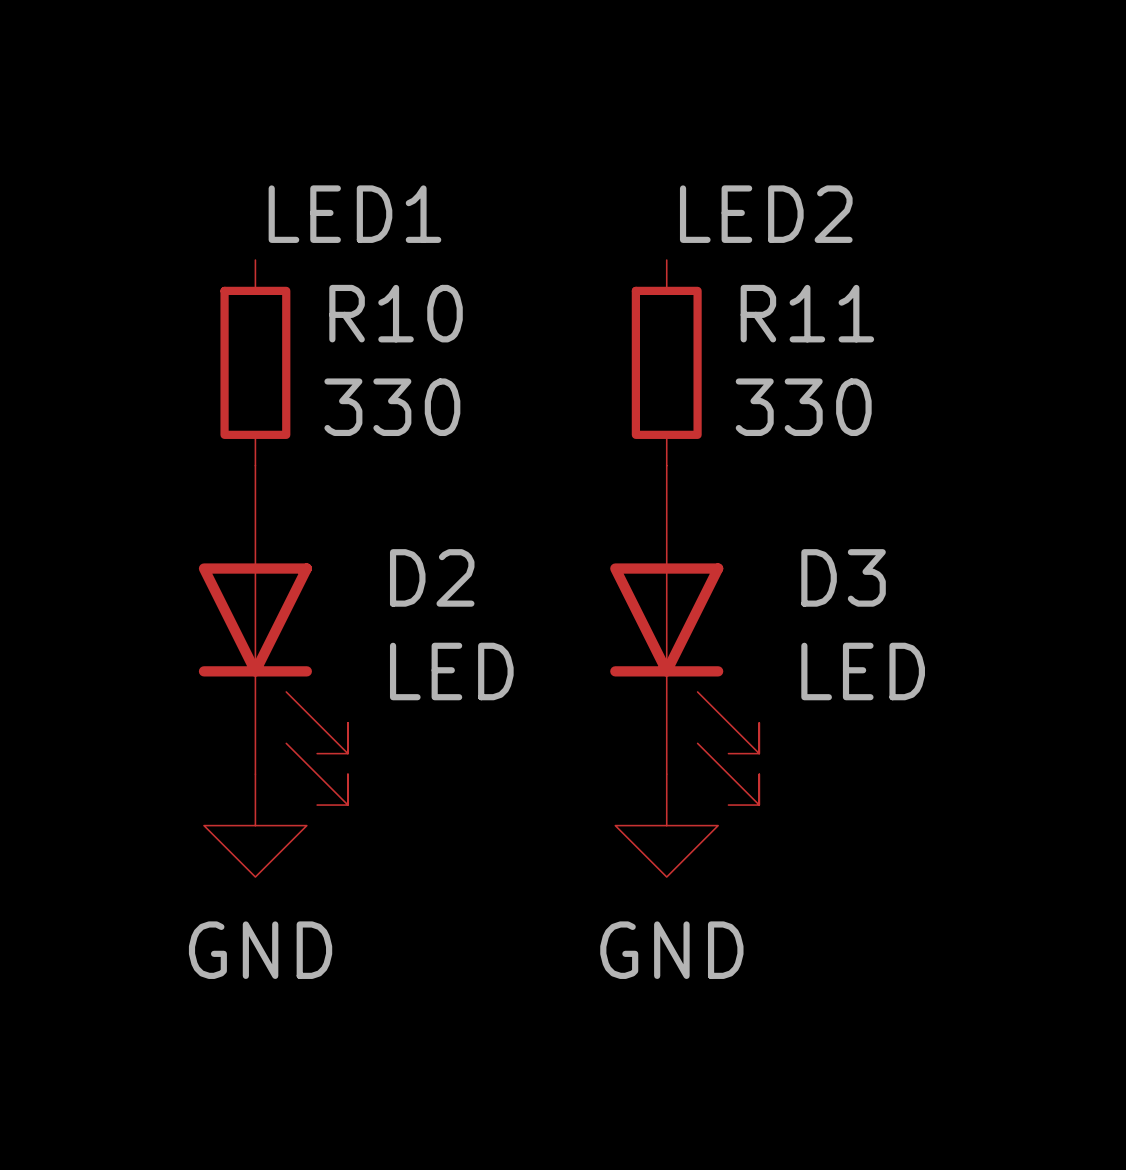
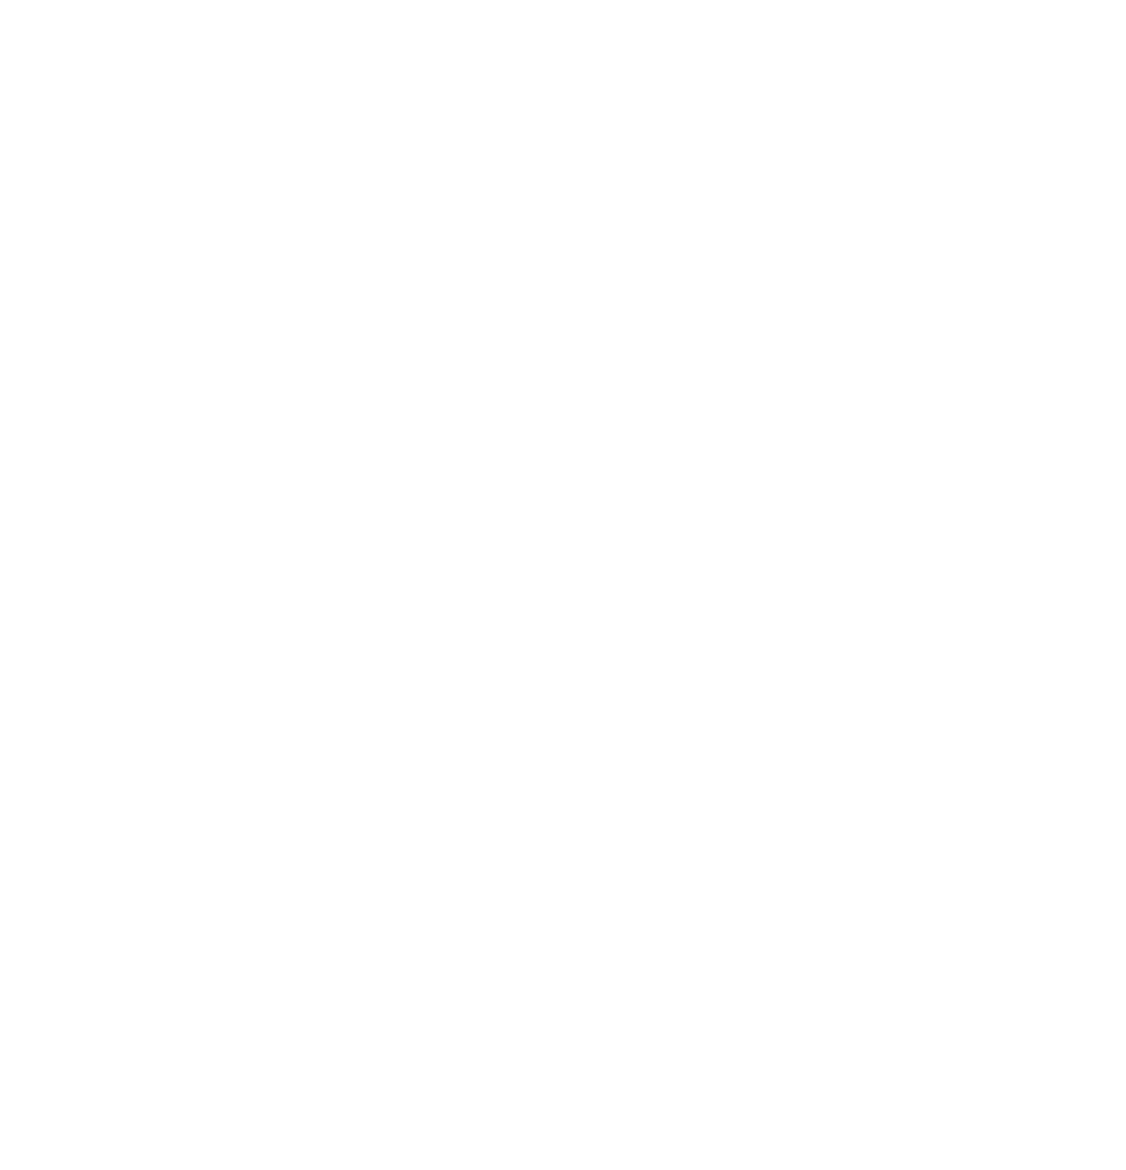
label: LED1 (354, 214) -> none
label: LED2 (766, 214) -> none
R10: 330 (255, 362) -> none
R11: 330 (666, 362) -> none
D2: LED (273, 635) -> none
D3: LED (684, 635) -> none
power symbol: GND (255, 825) -> none
power symbol: GND (666, 825) -> none

